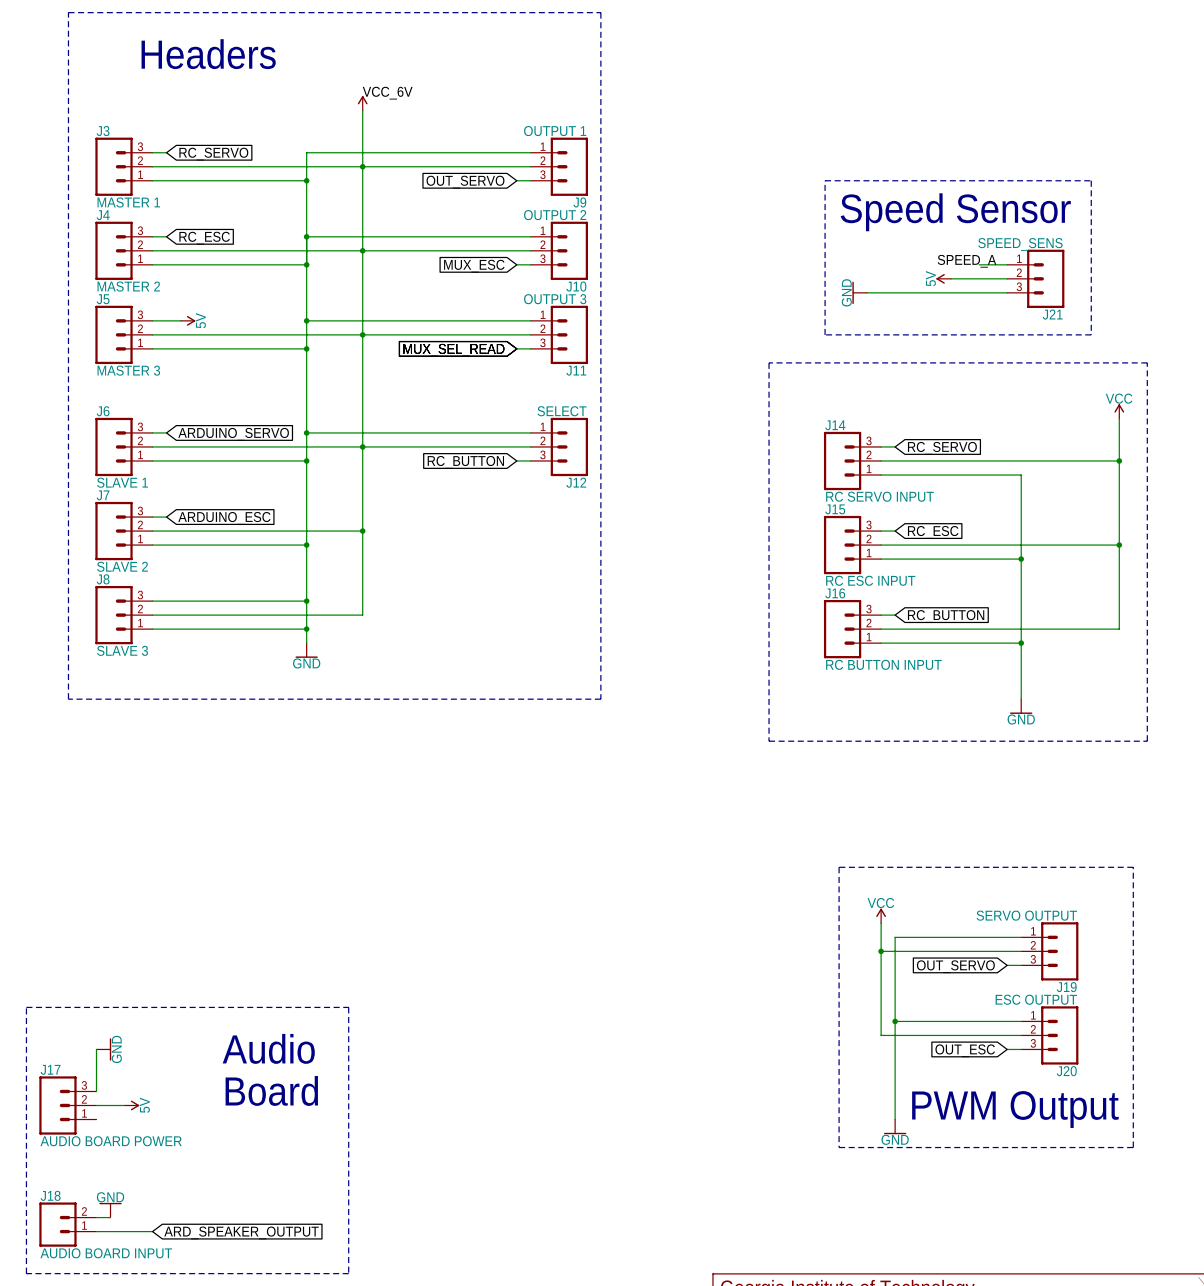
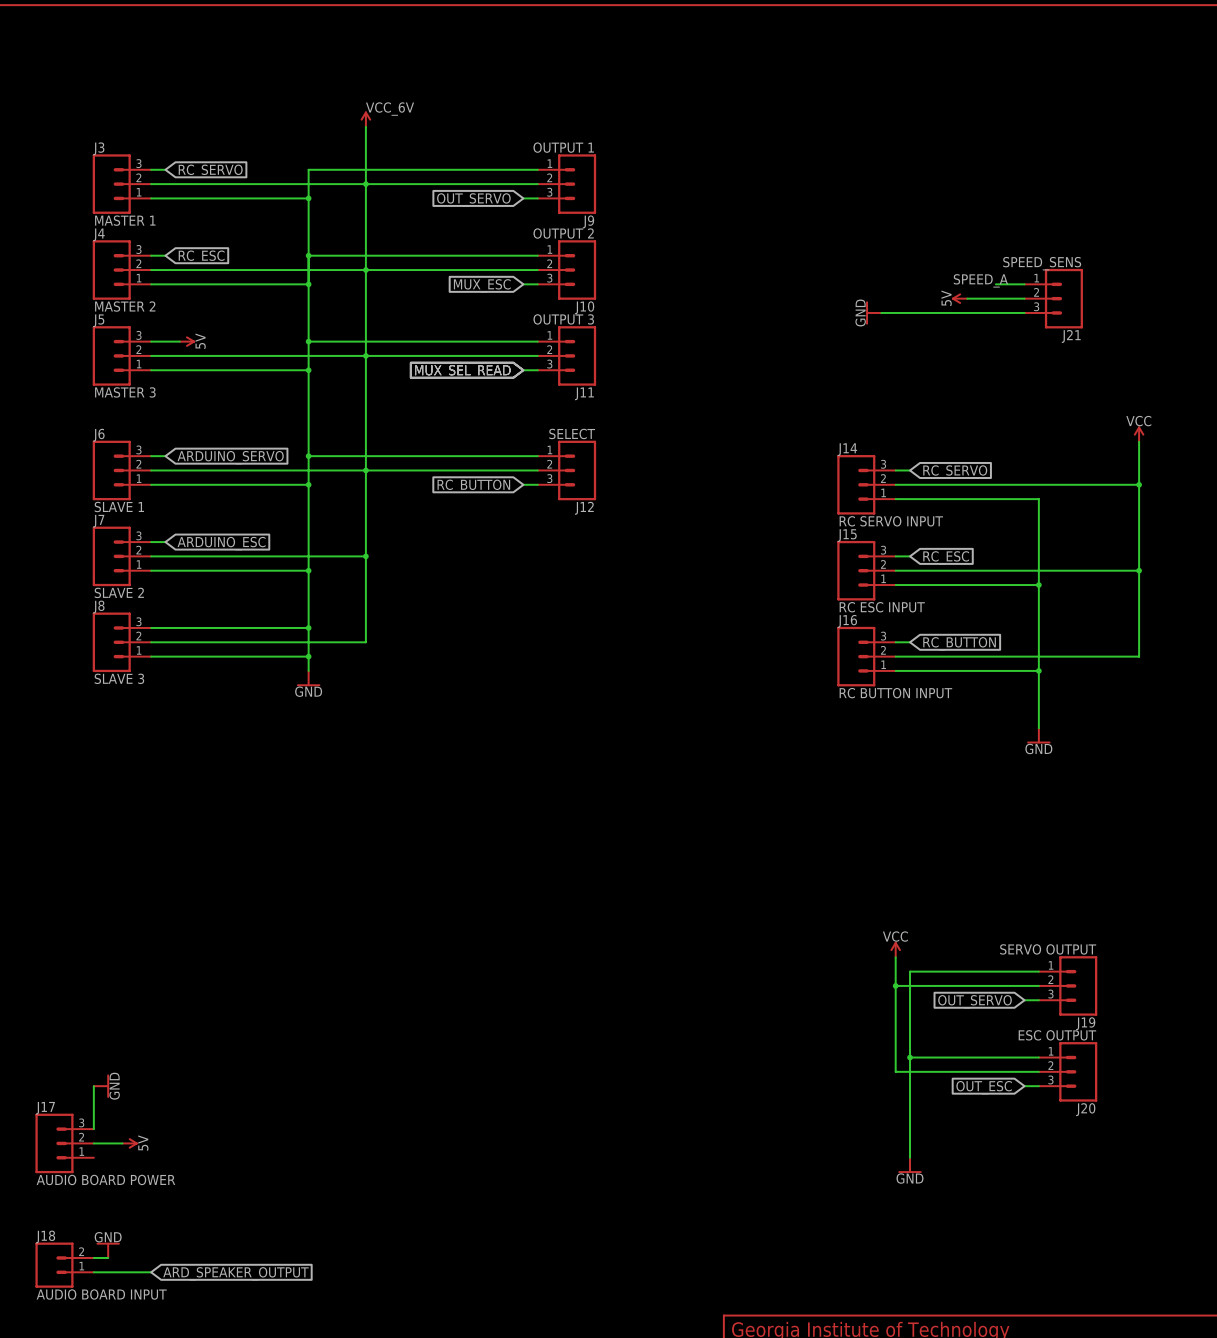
line: (68, 12) (68, 699) (600, 699) (600, 12) (68, 12) -> none
text: Headers (208, 54) -> none
line: (825, 180) (825, 334) (1091, 334) (1091, 180) (825, 180) -> none
text: Speed Sensor (955, 212) -> none
line: (769, 362) (1147, 362) (1147, 741) (769, 741) (769, 362) -> none
line: (839, 867) (839, 1147) (1133, 1147) (1133, 867) (839, 867) -> none
line: (26, 1007) (26, 1273) (348, 1273) (348, 1007) (26, 1007) -> none
text: Audio (268, 1048) -> none
text: Board (271, 1090) -> none
text: PWM Output (1015, 1109) -> none

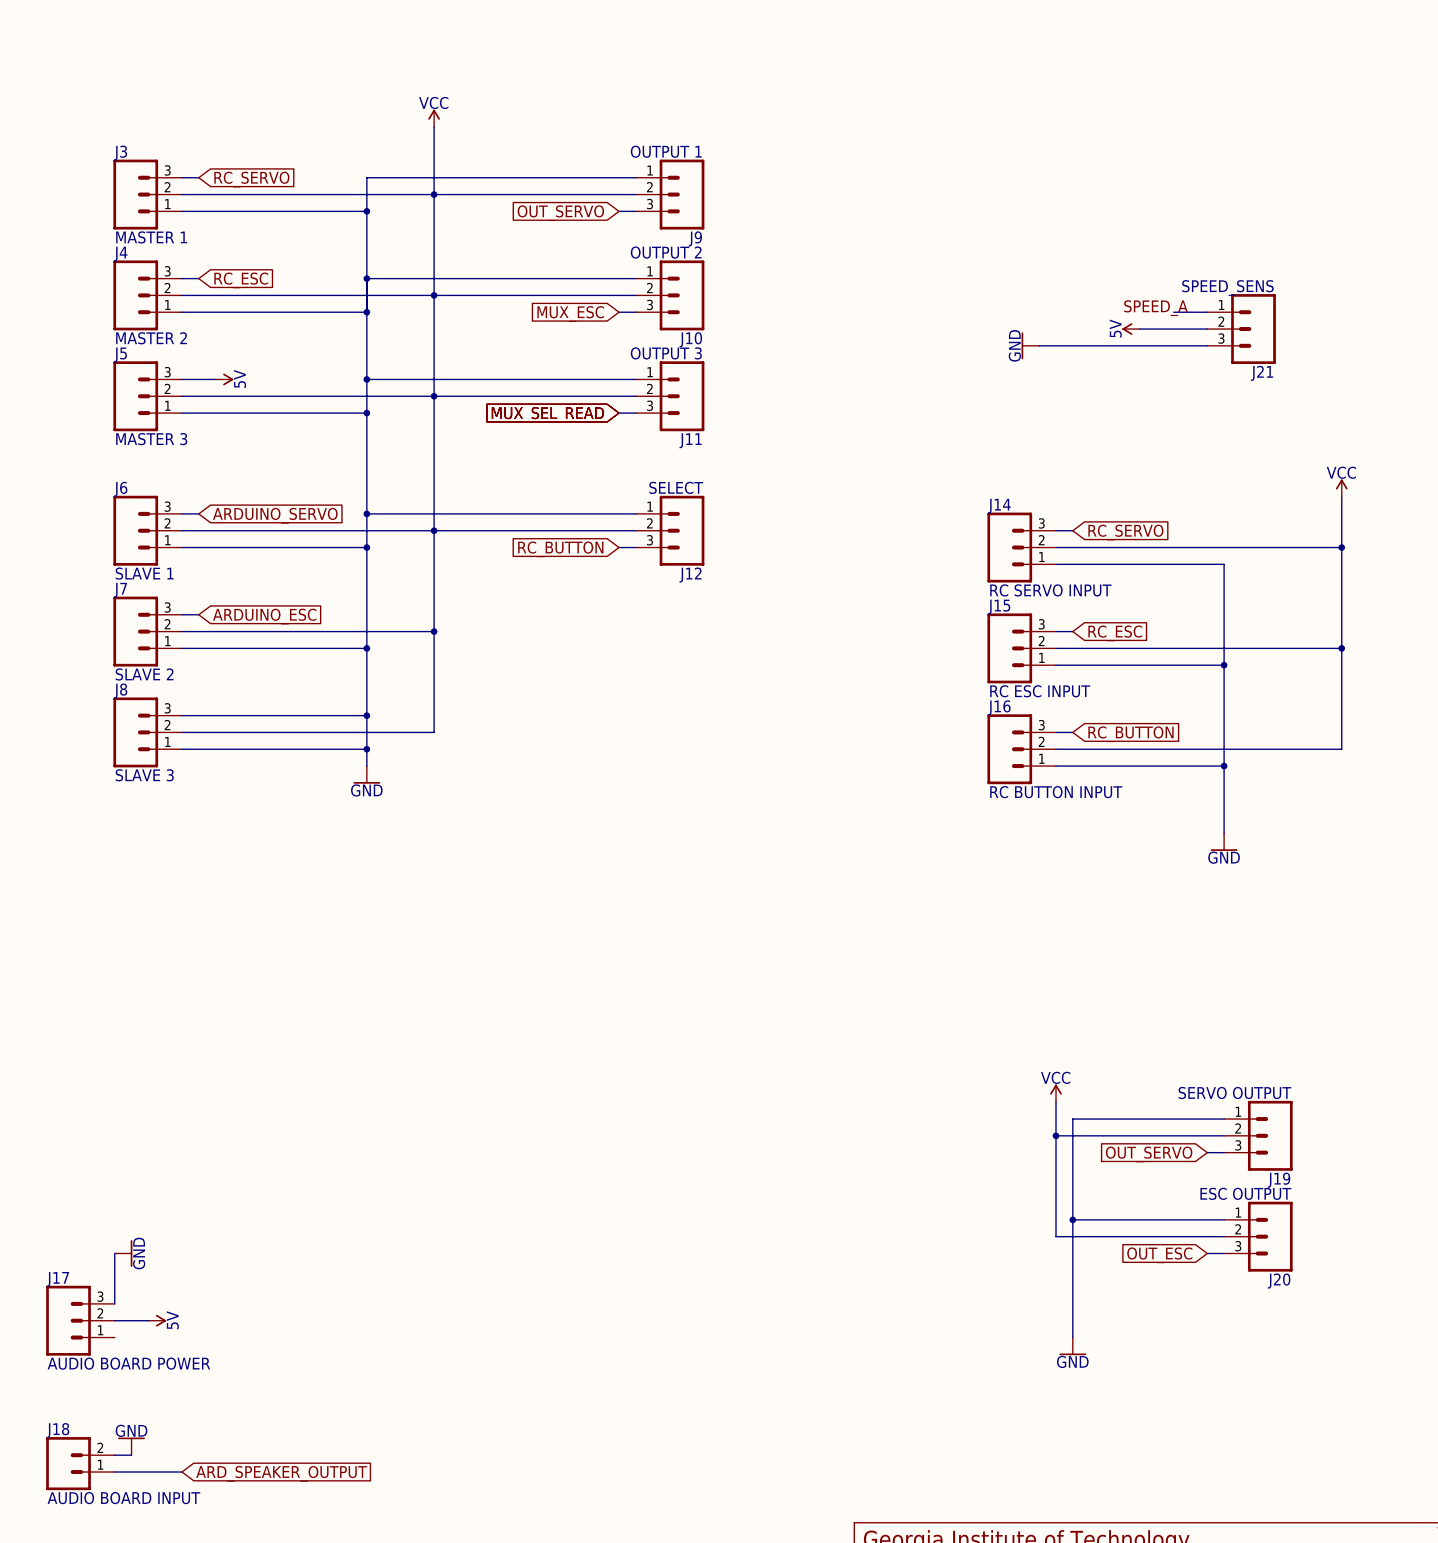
power symbol text: none -> VCC (433, 102)
label: VCC_6V (390, 109) -> none

